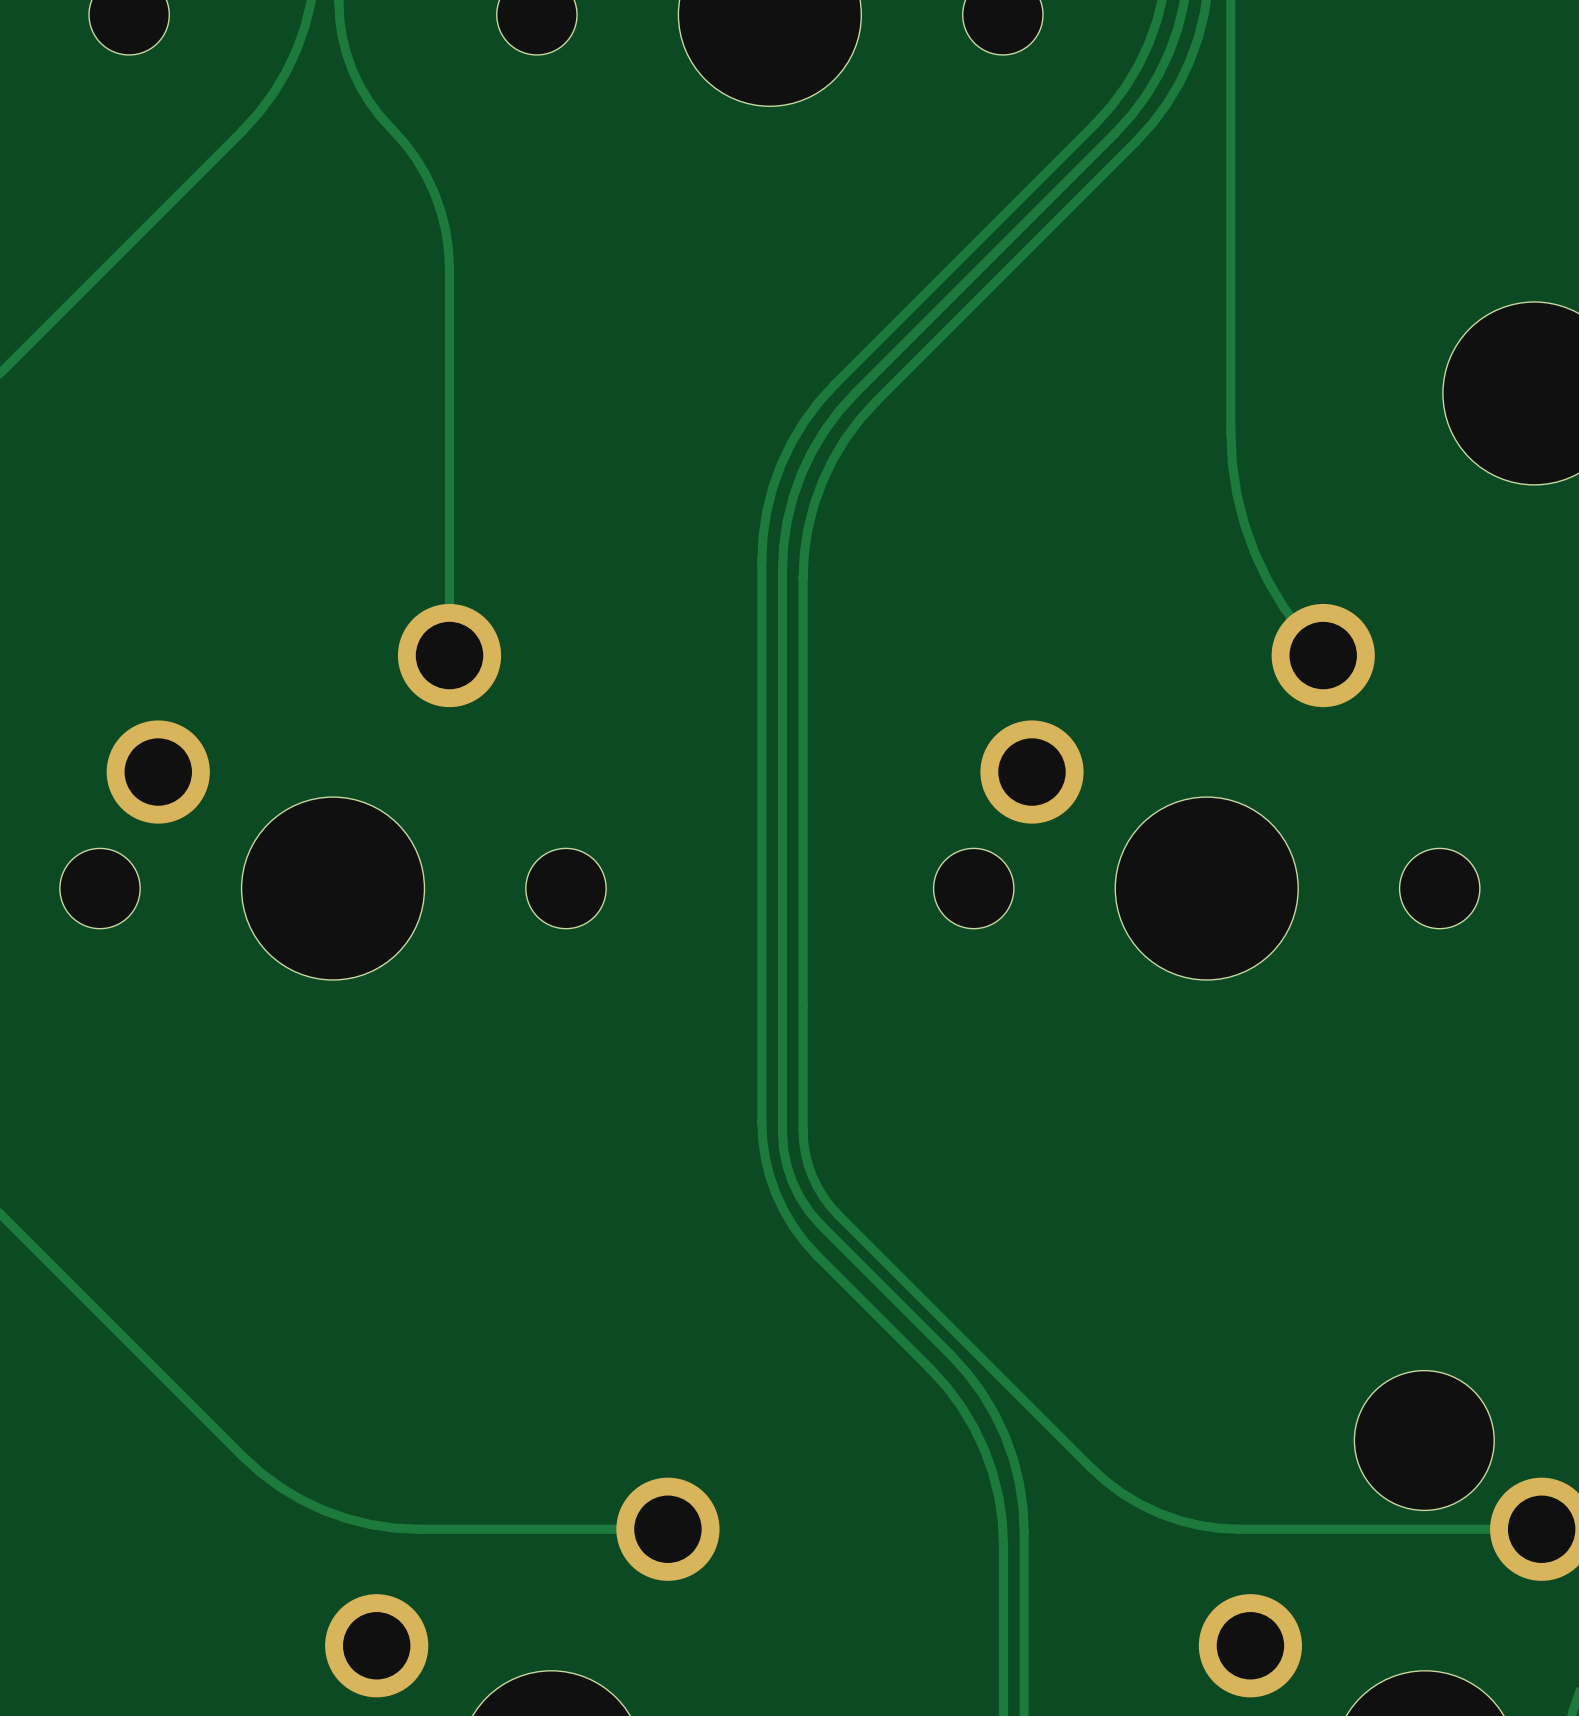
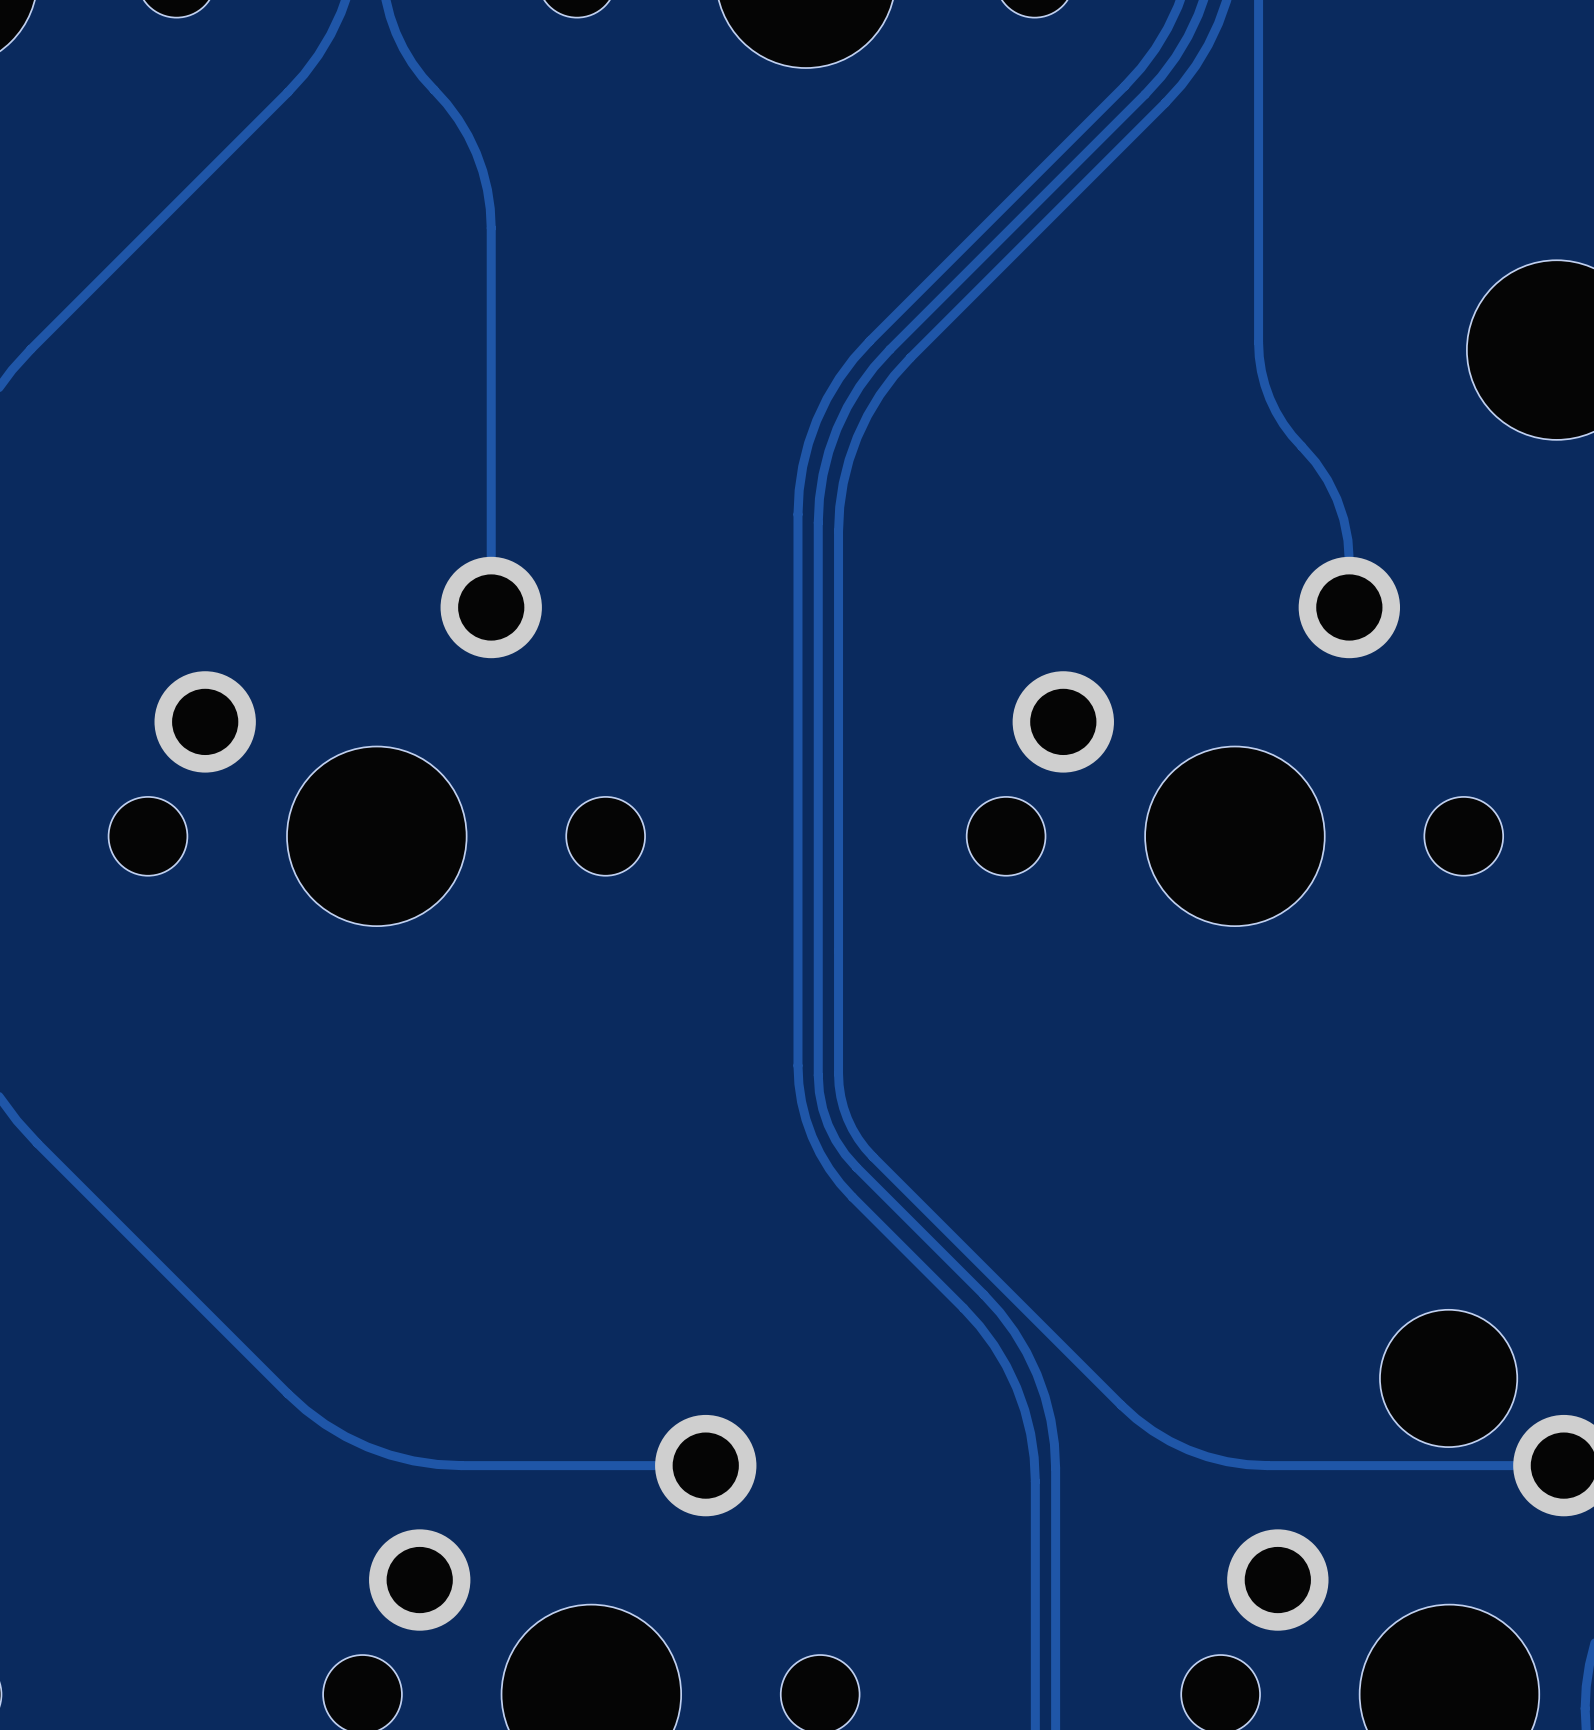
track: (1230, 385) (1232, 463) (1236, 493) (1244, 524) (1254, 553) (1268, 581) (1283, 607) (1302, 632) (1323, 655) -> (1258, 342) (1264, 385) (1275, 411) (1291, 435) (1315, 462) (1336, 499) (1347, 540) (1349, 607)

